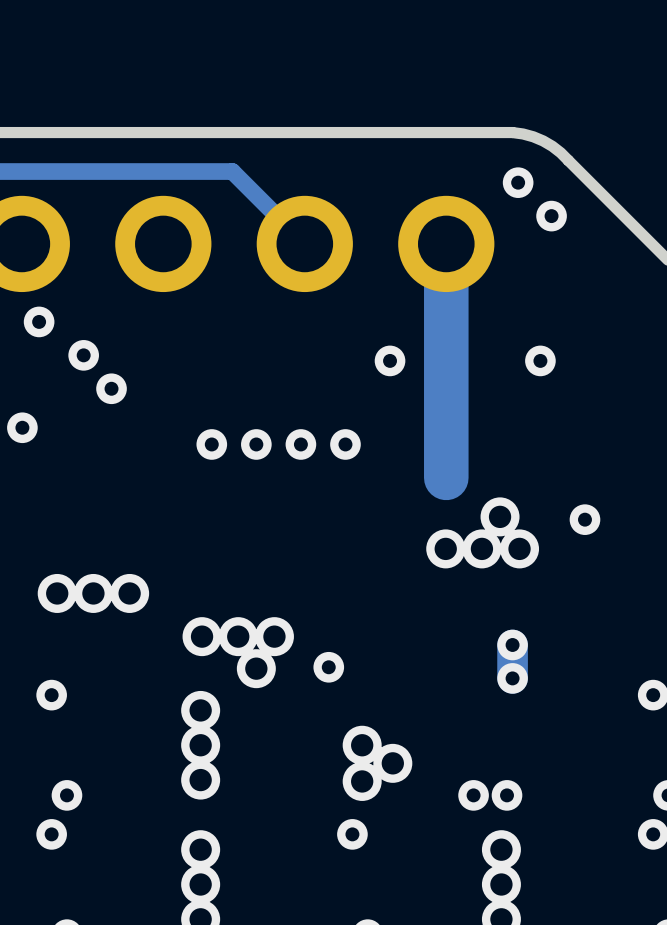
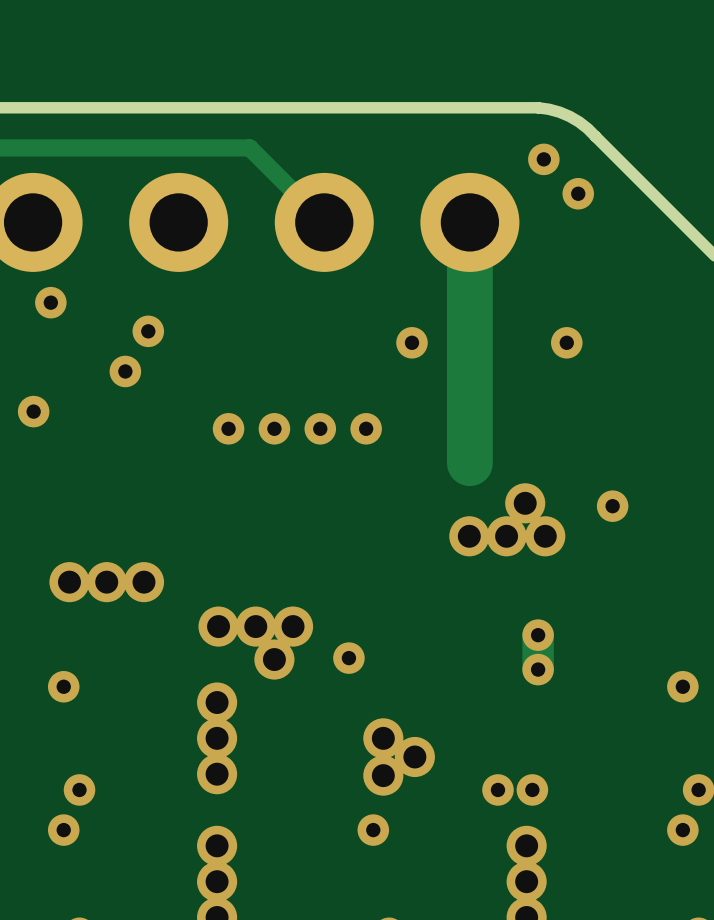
via position: (83, 355) -> (148, 331)

